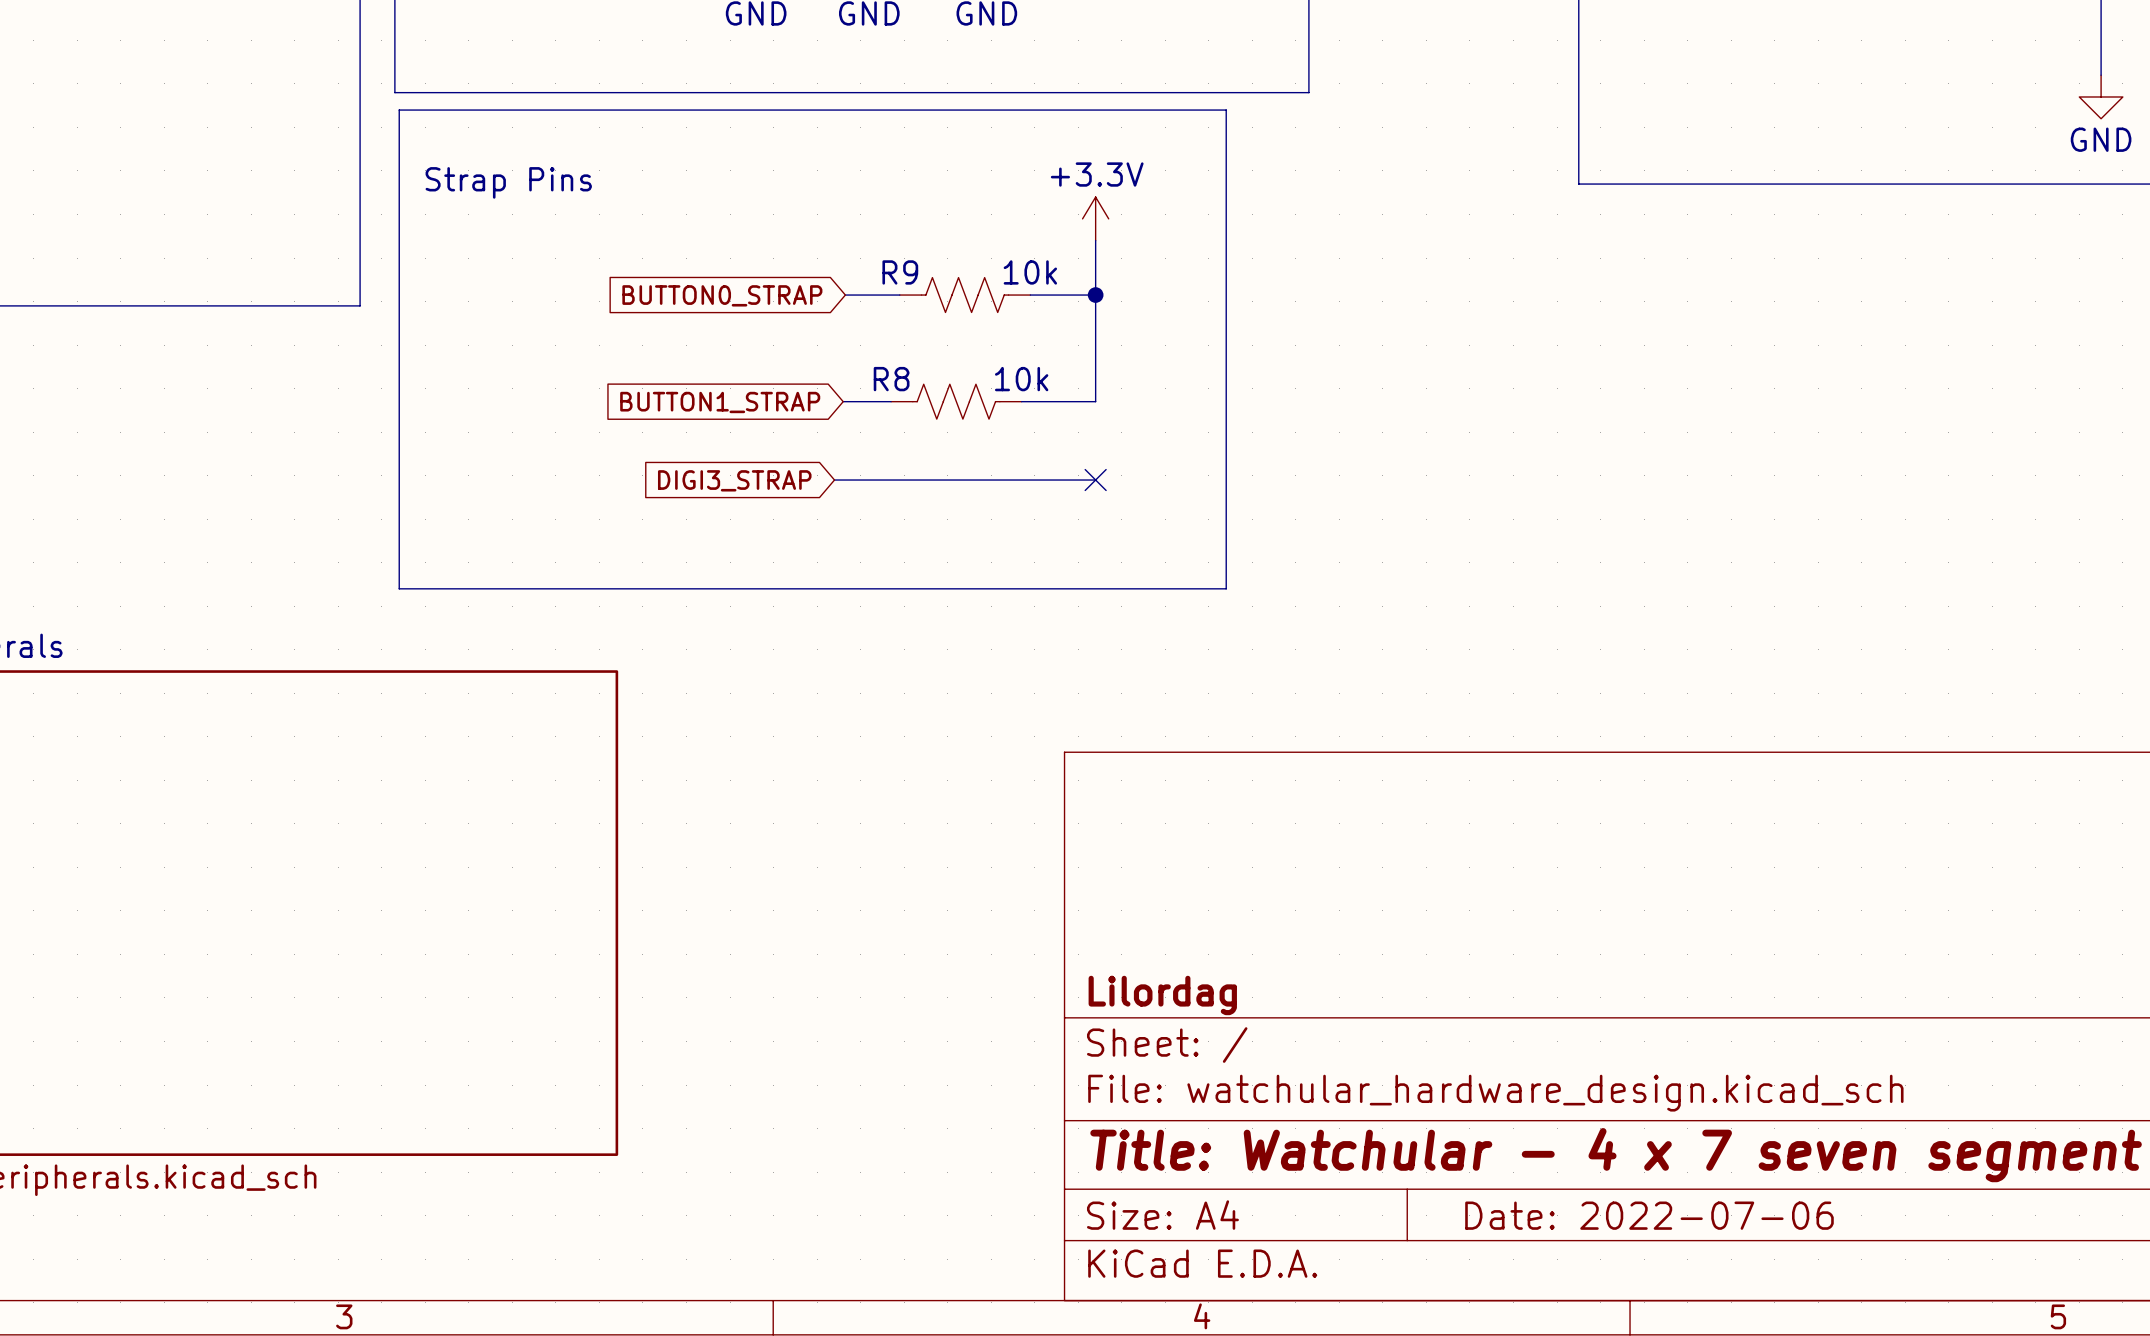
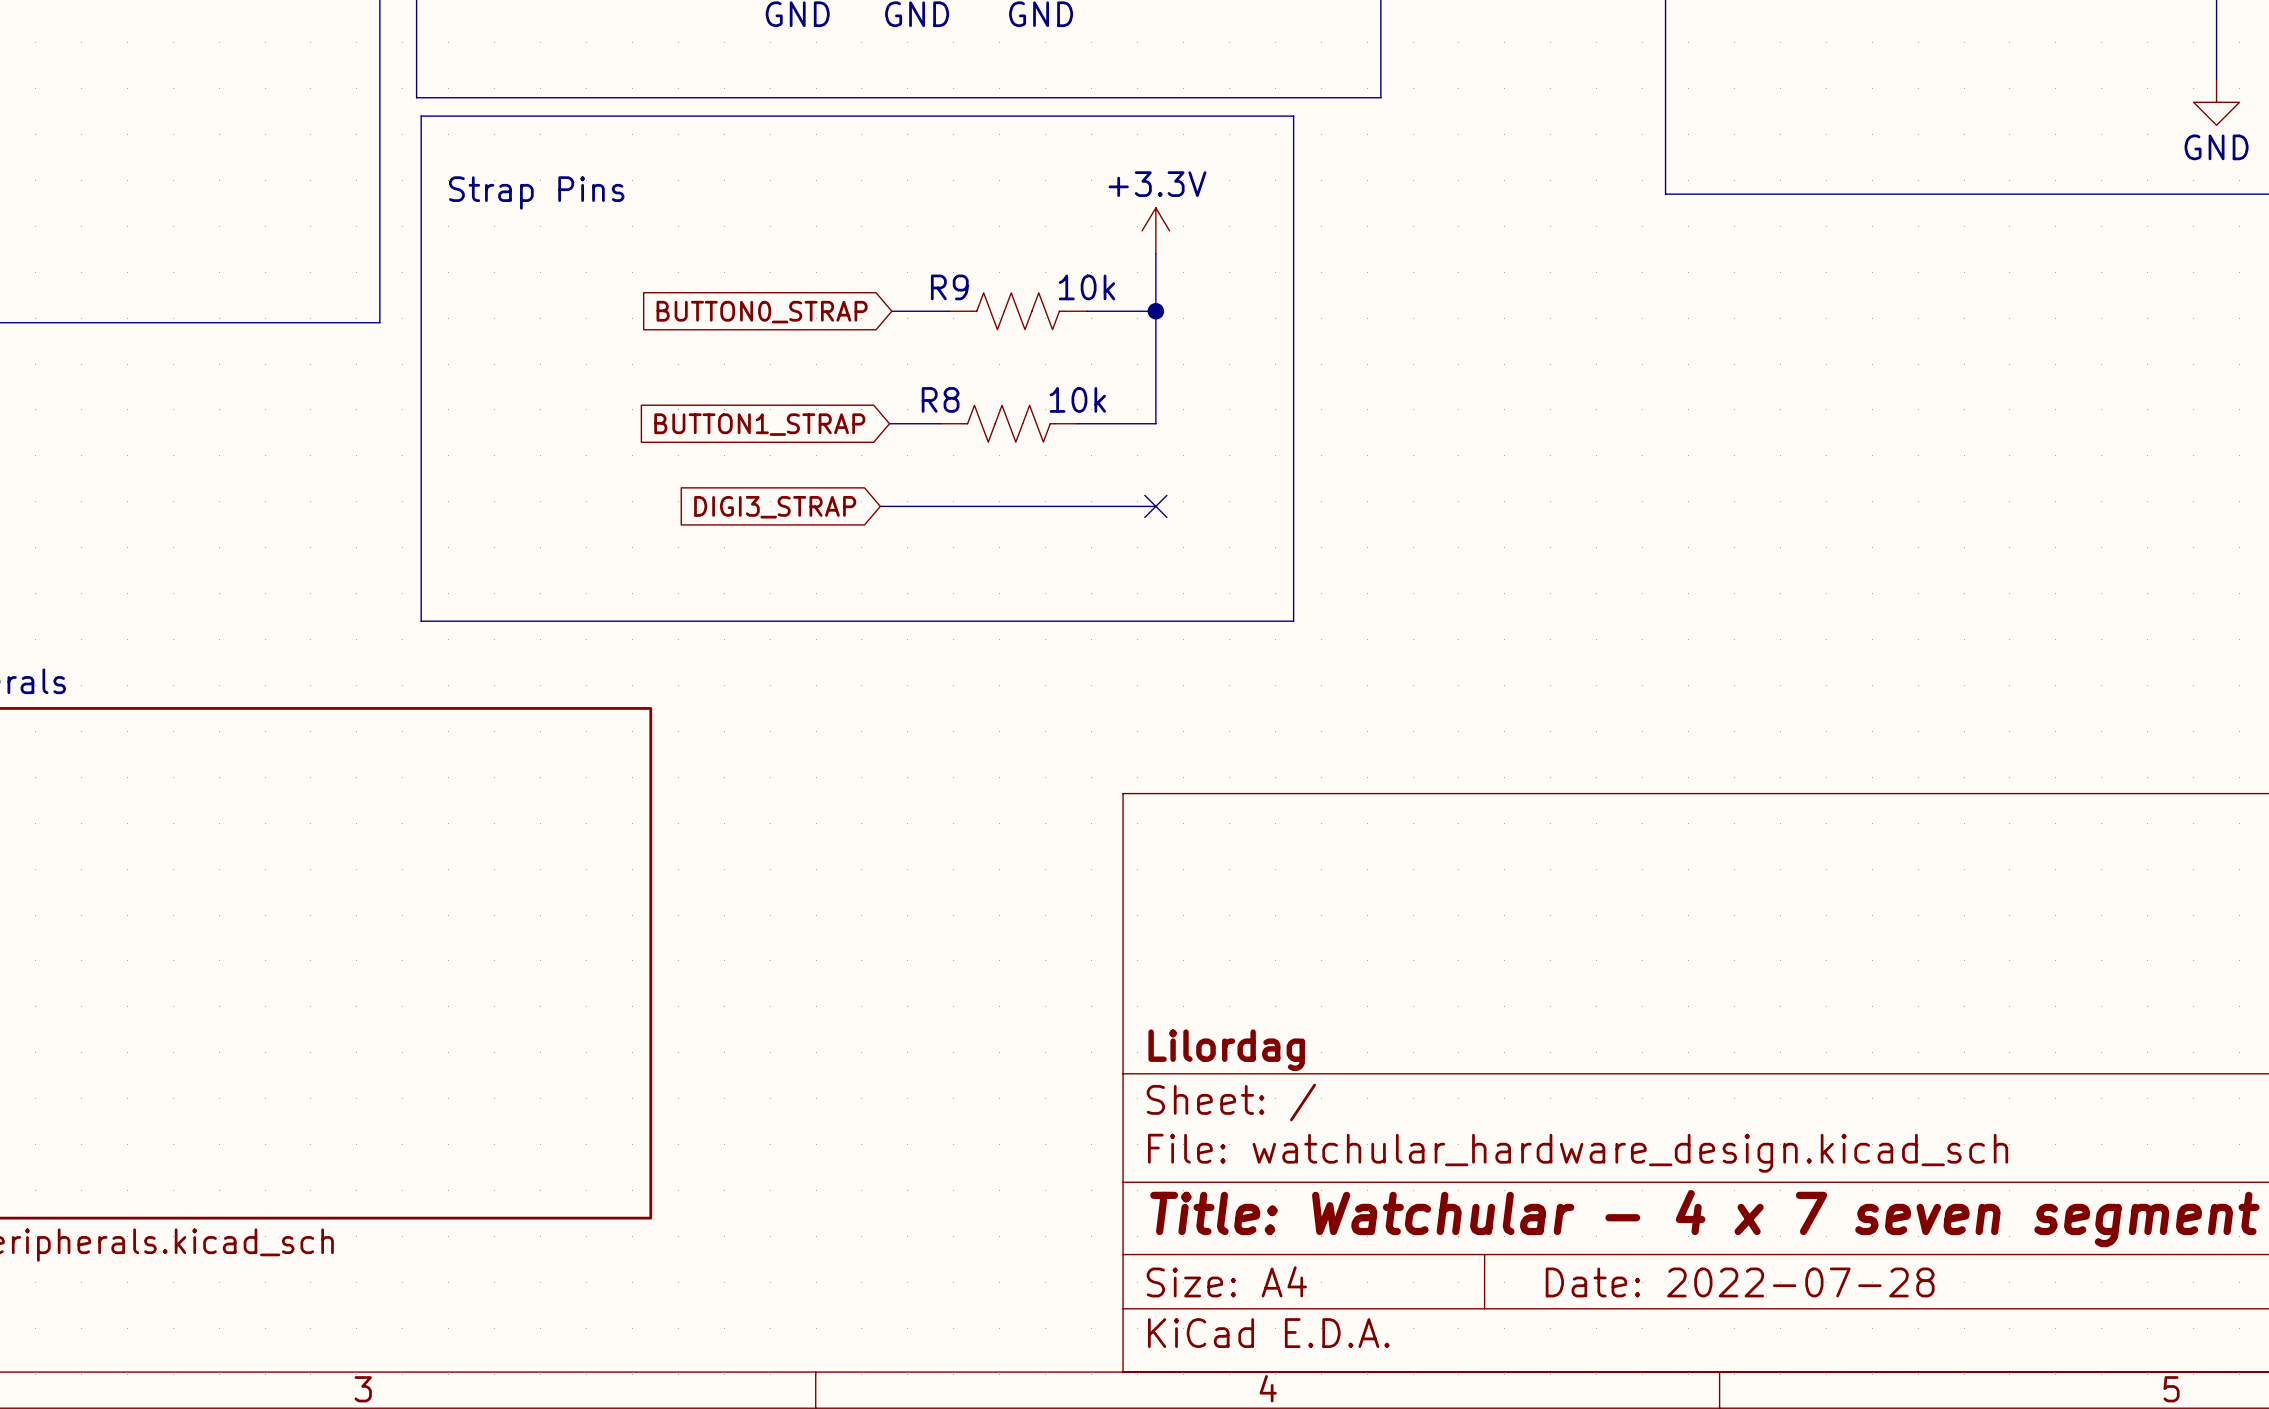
title block: Date: 2022-07-06 (1649, 1215) -> Date: 2022-07-28 (1740, 1282)

